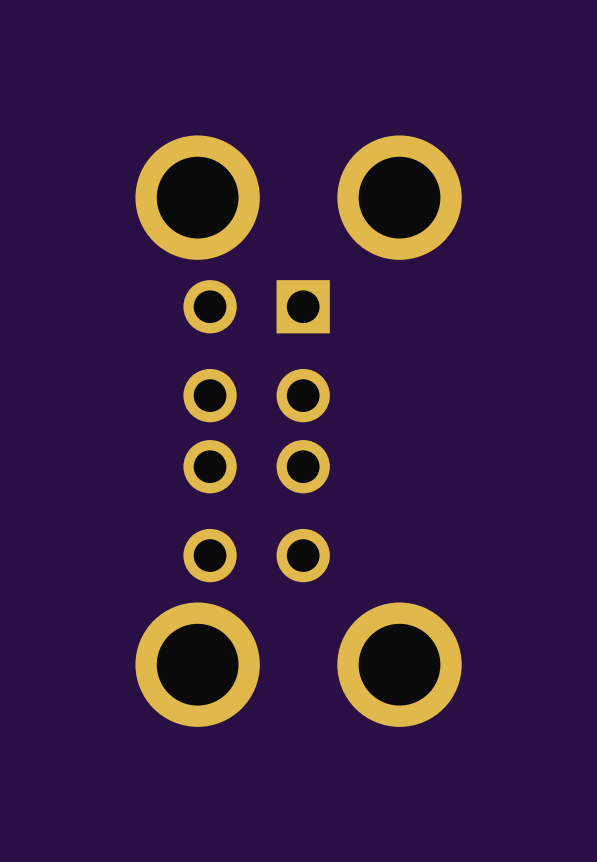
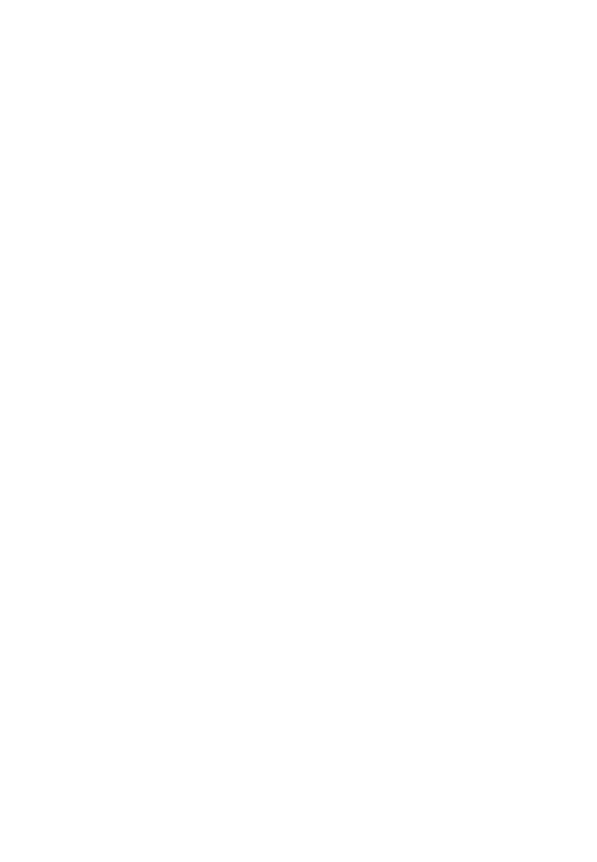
part: (298, 431) -> none

